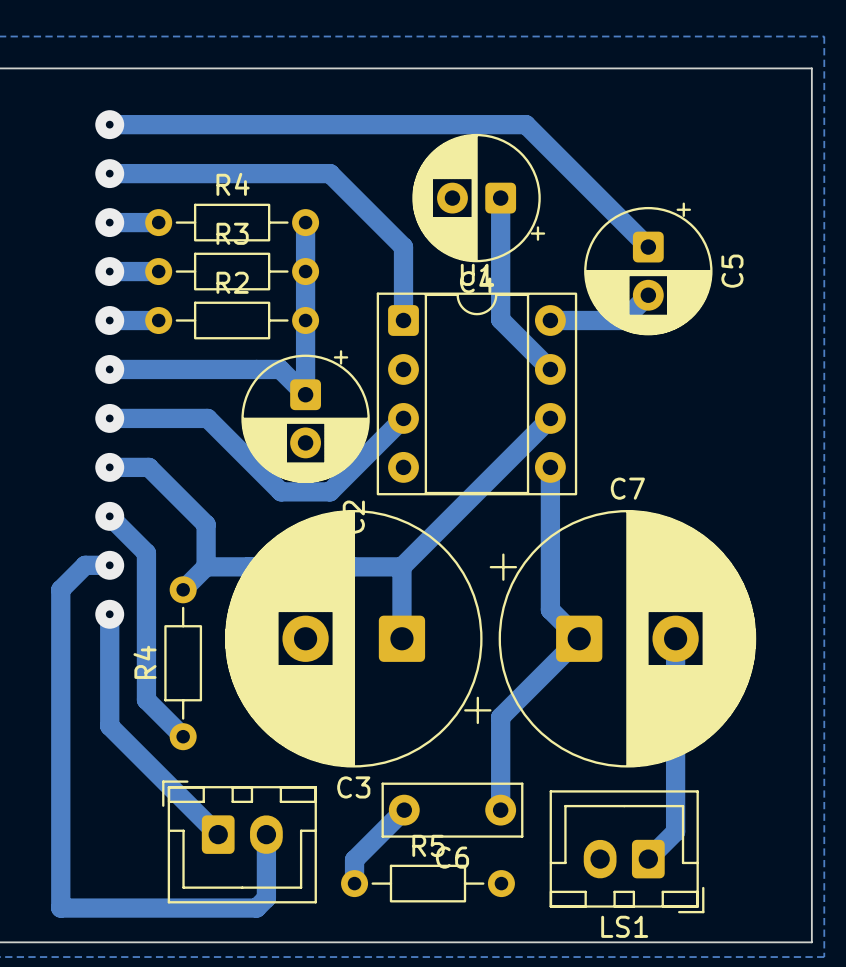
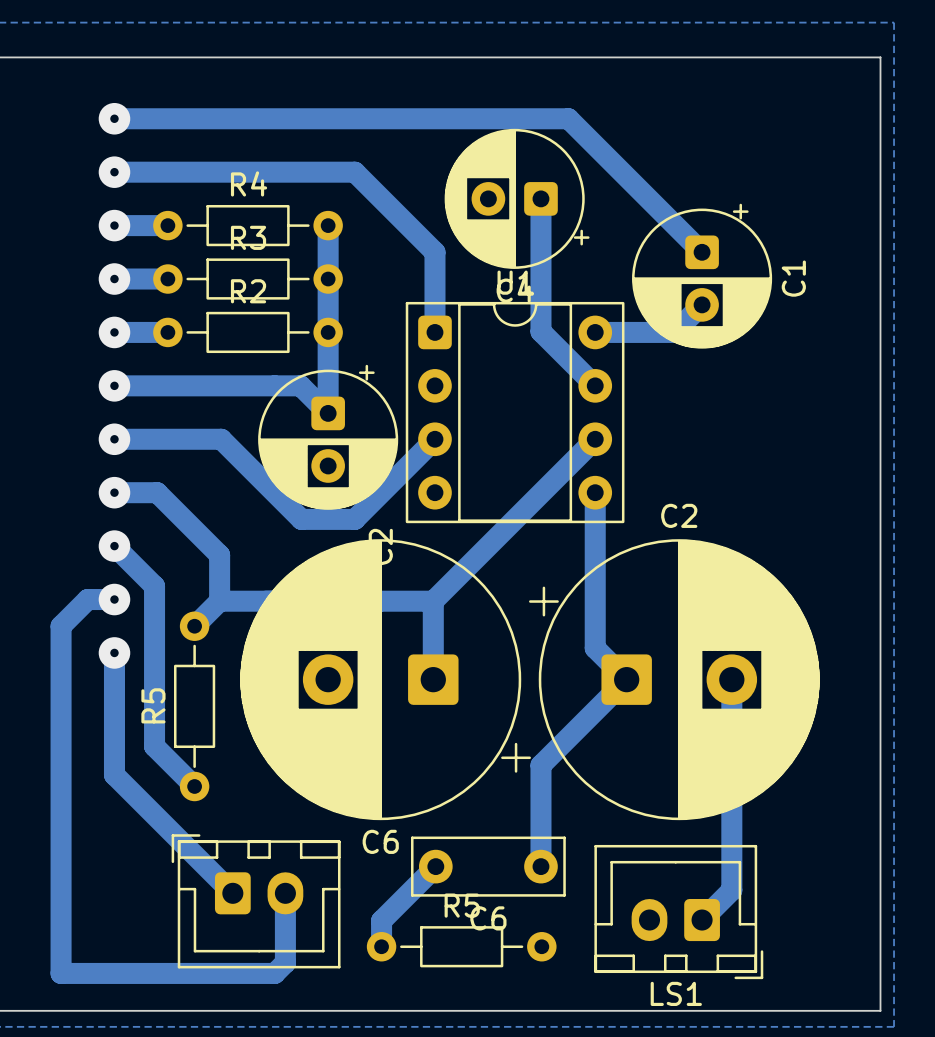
C5 name: C5 (732, 271) -> C1 (793, 278)
C7 name: C7 (627, 488) -> C2 (679, 515)
R4 name: R4 (144, 662) -> R5 (153, 705)
C3 name: C3 (353, 787) -> C6 (380, 841)

